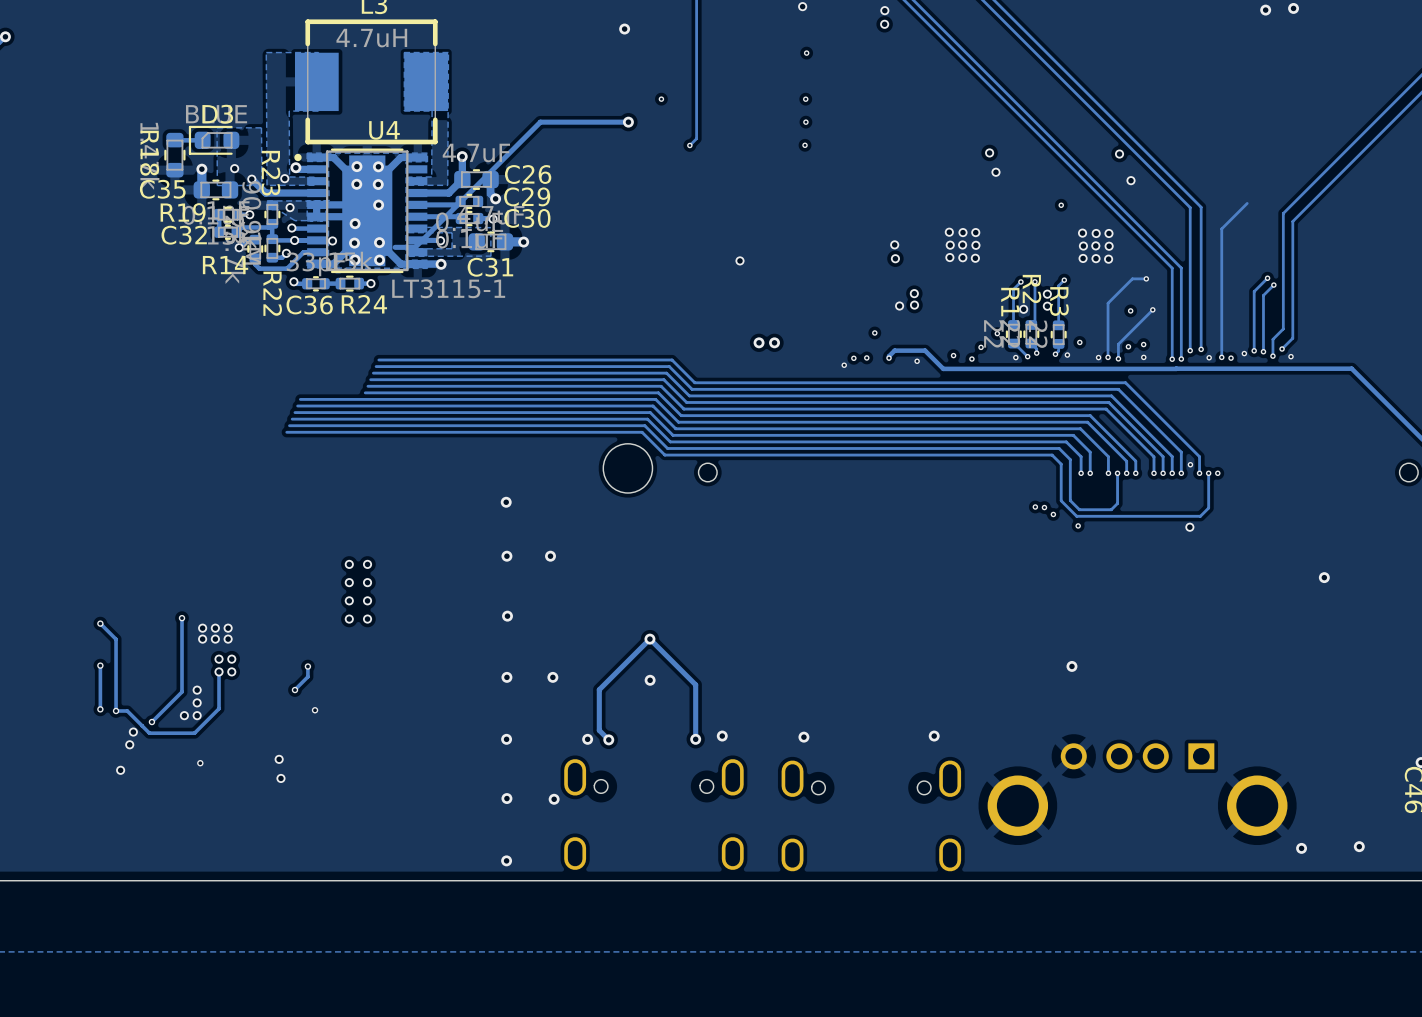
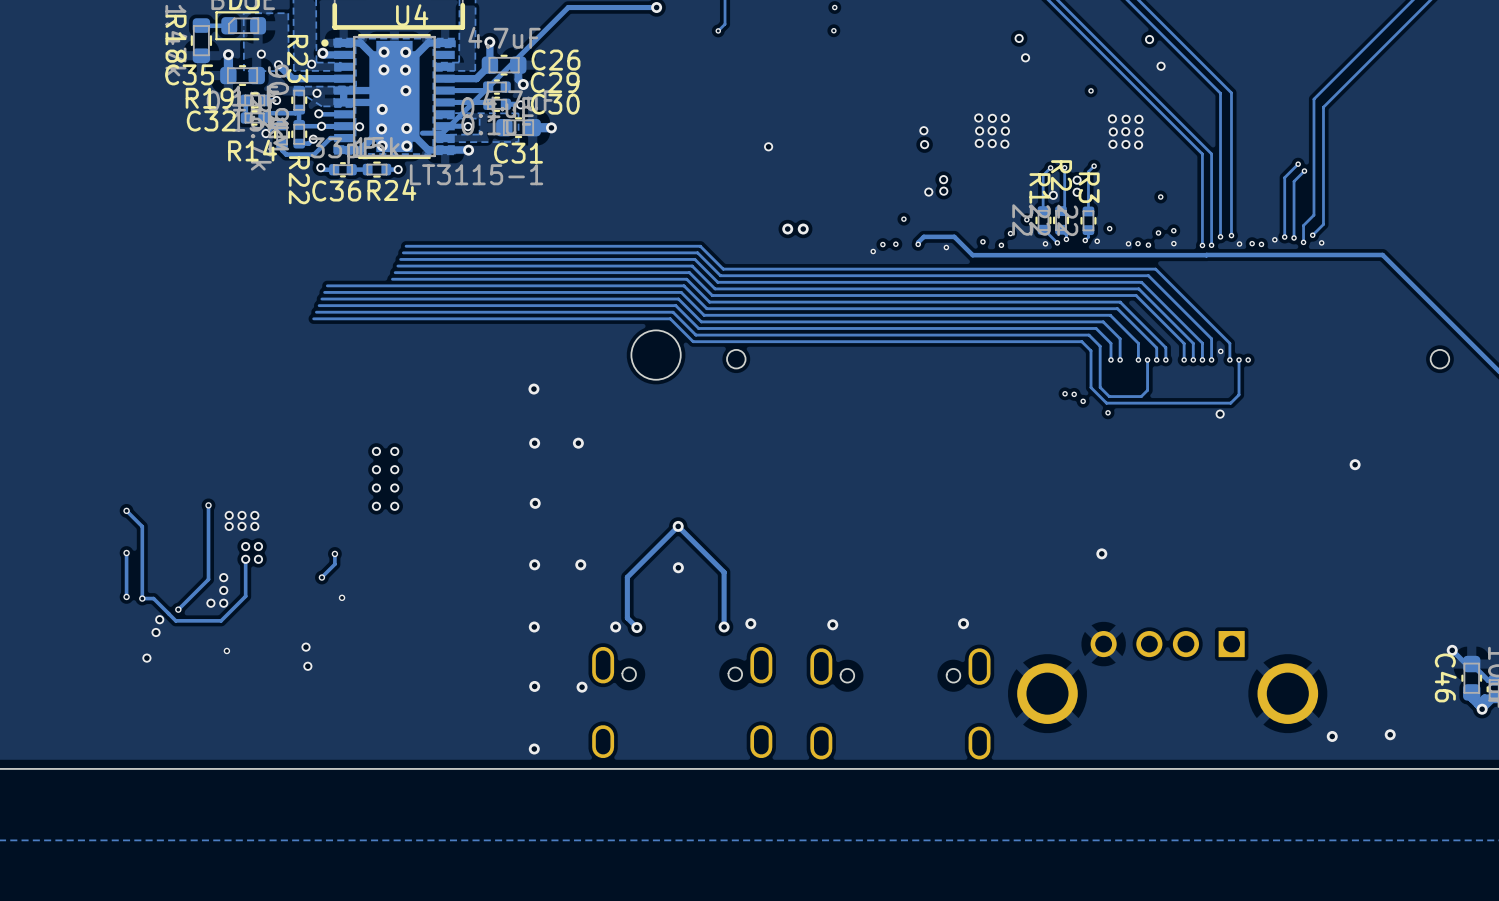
track: (1247, 203) (1221, 228) (1221, 357) -> none
track: (1146, 278) (1132, 278) (1108, 303) (1108, 357) -> none
via: (1146, 278) -> none
track: (1152, 309) (1118, 344) (1118, 358) -> none
via: (1152, 309) -> none

